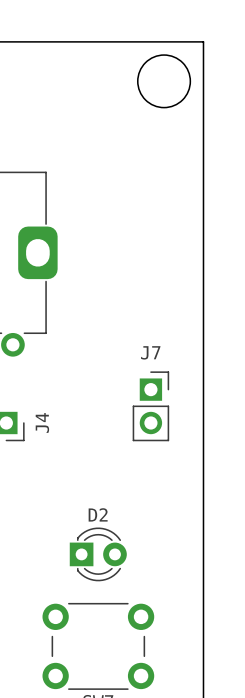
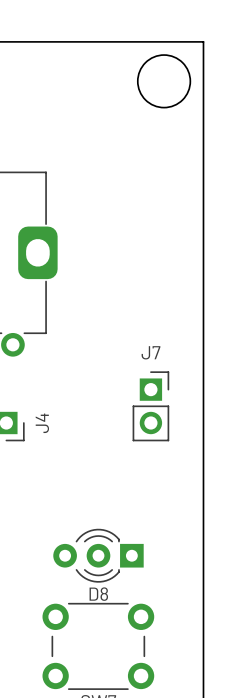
D2: (98, 554) -> none
D8: none -> (98, 555)

